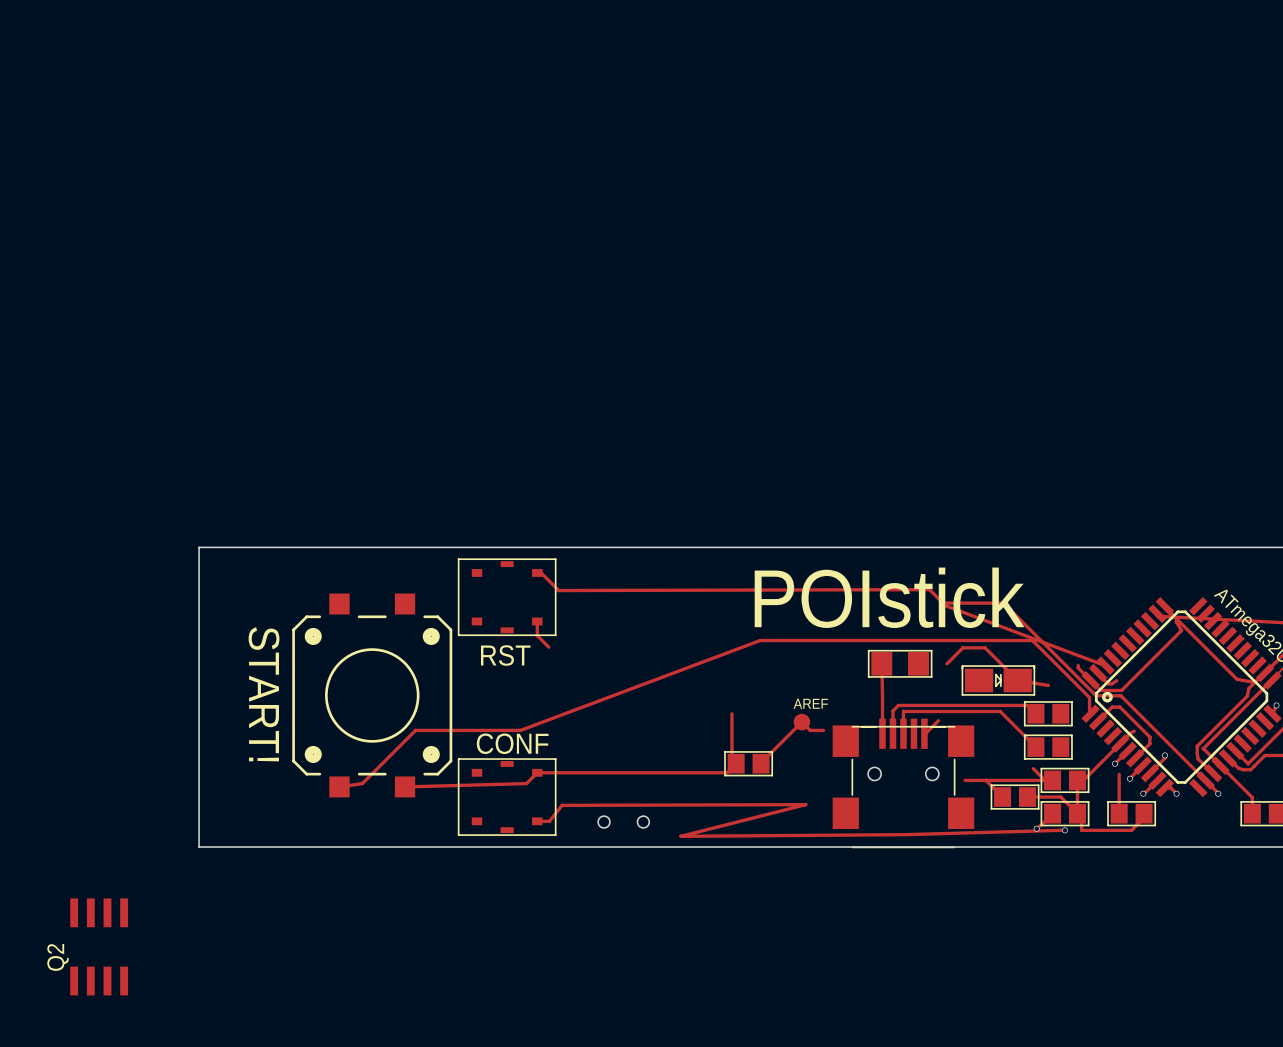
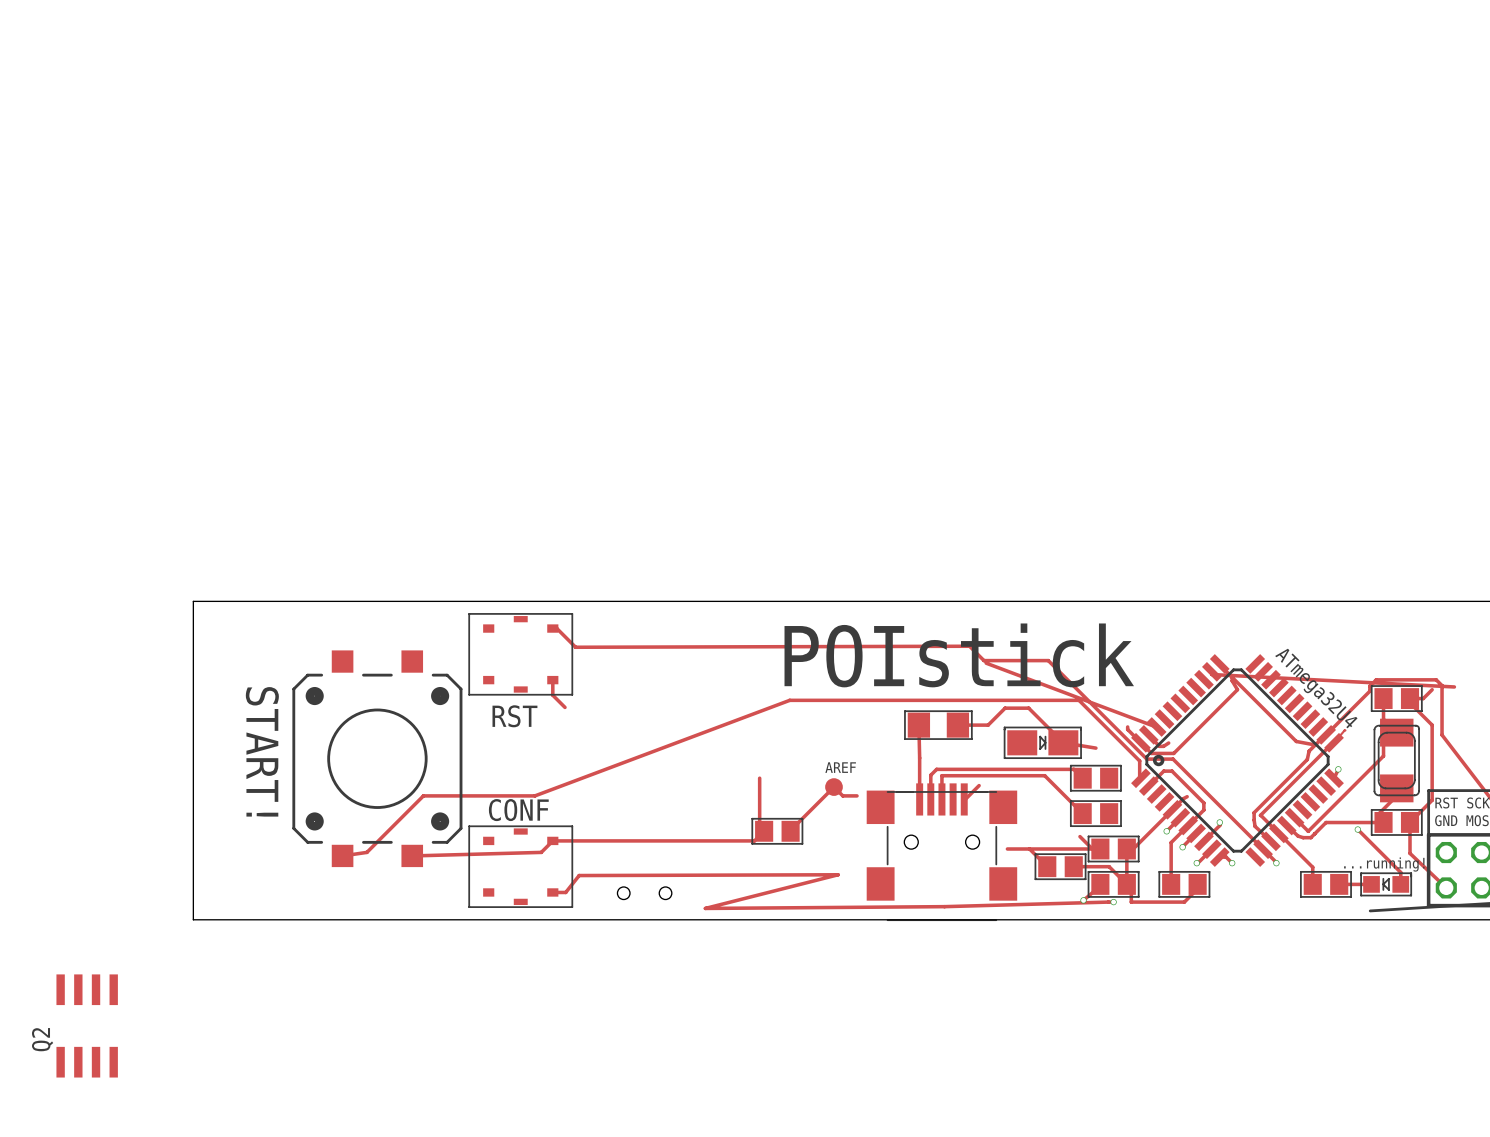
track: none -> (957, 725) (988, 725)
track: none -> (1188, 825) (1171, 842)

